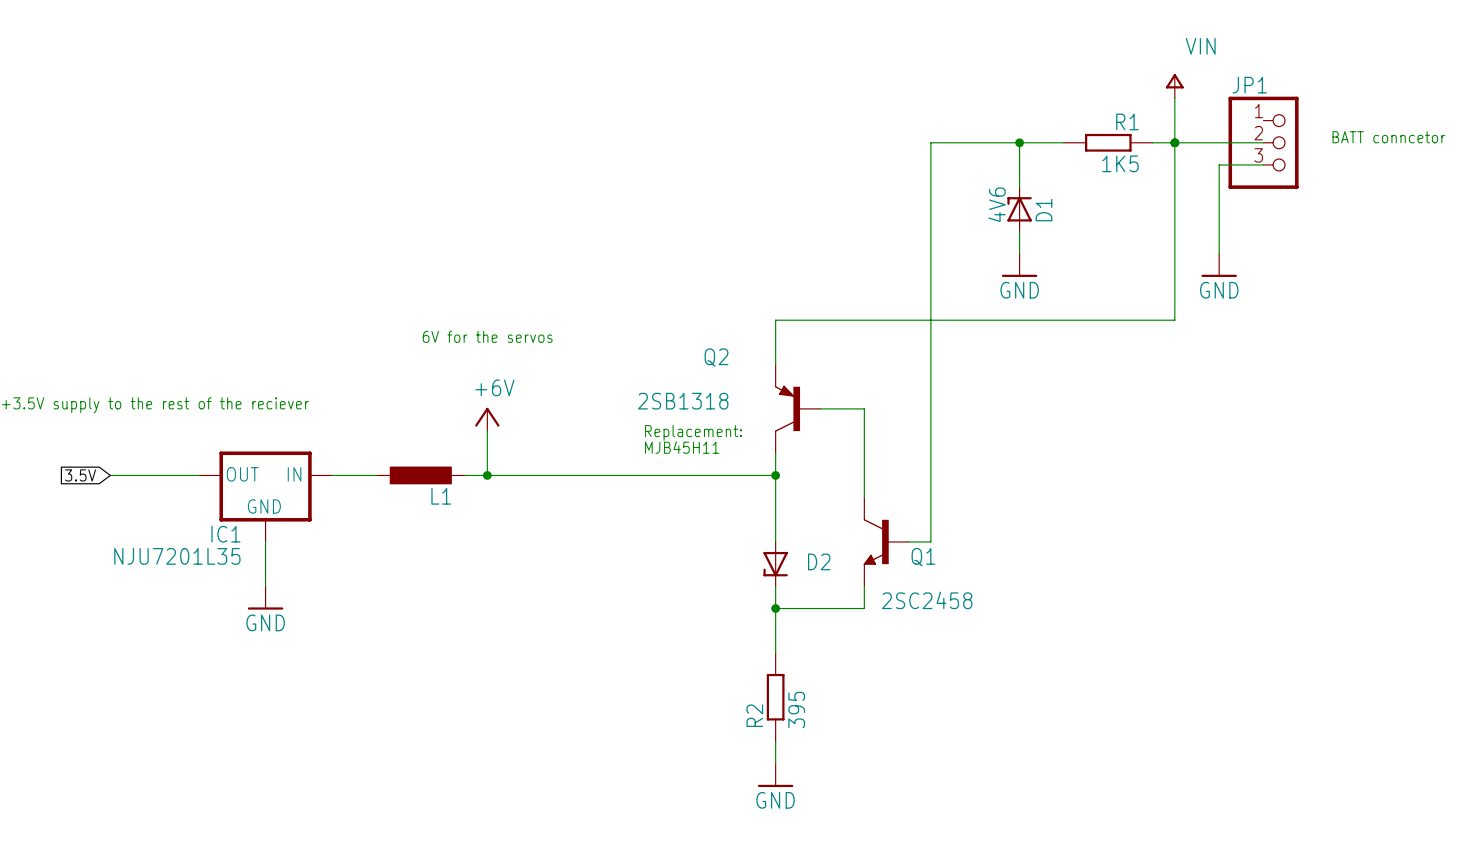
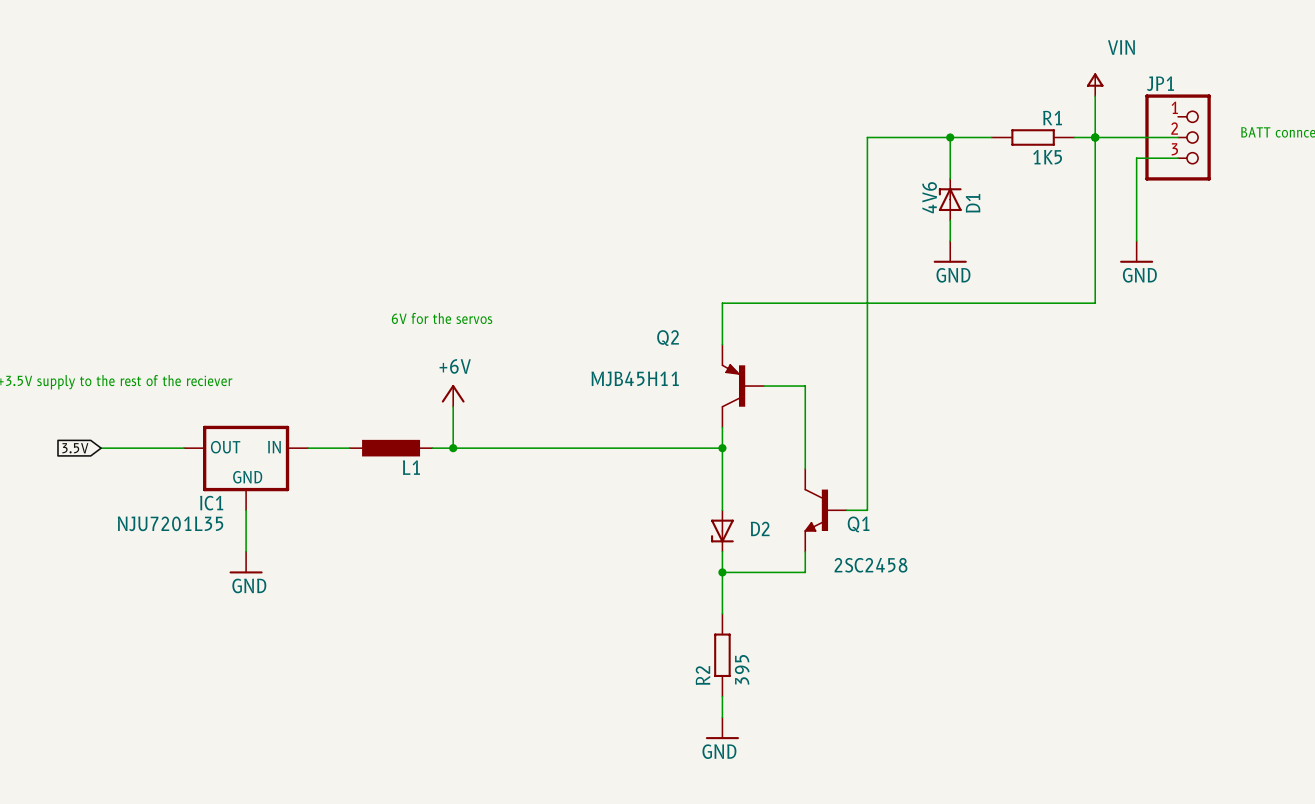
Q2 value: 2SB1318 (683, 401) -> MJB45H11 (635, 378)
text: Replacement: (693, 432) -> none
text: MJB45H11 (682, 447) -> none

